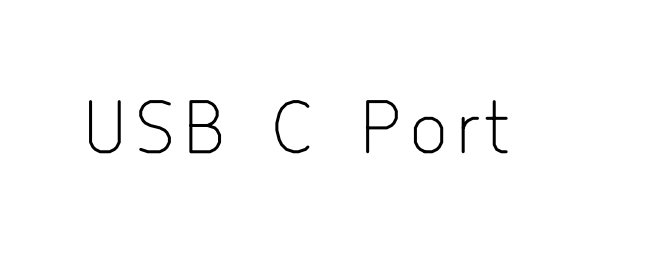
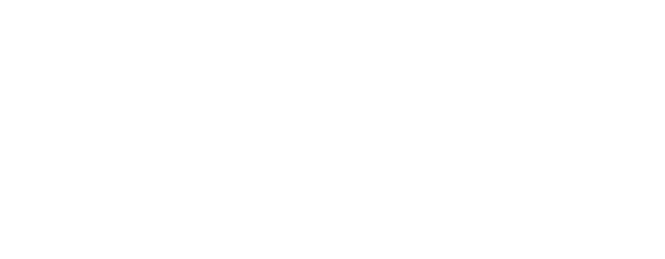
label: USB C Port (298, 126) -> none

